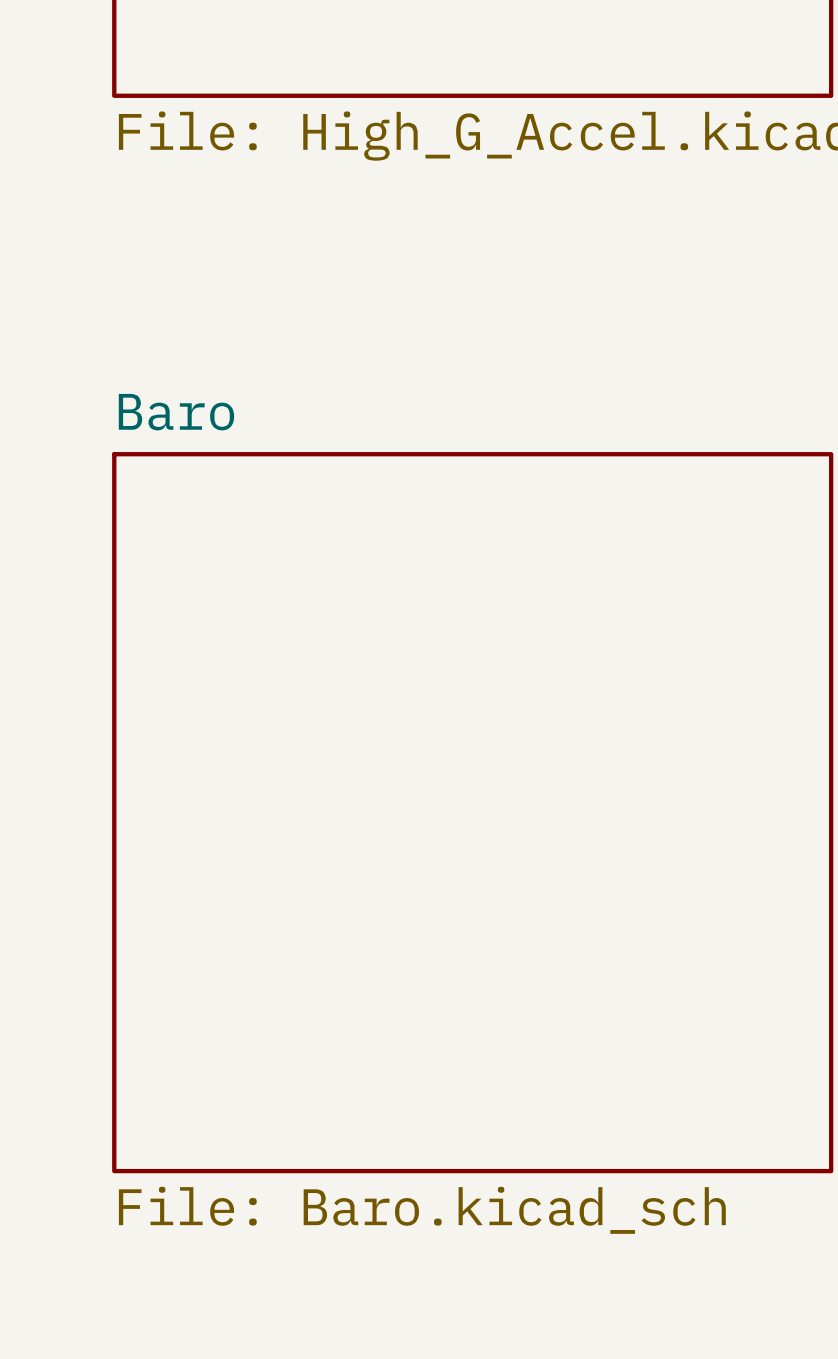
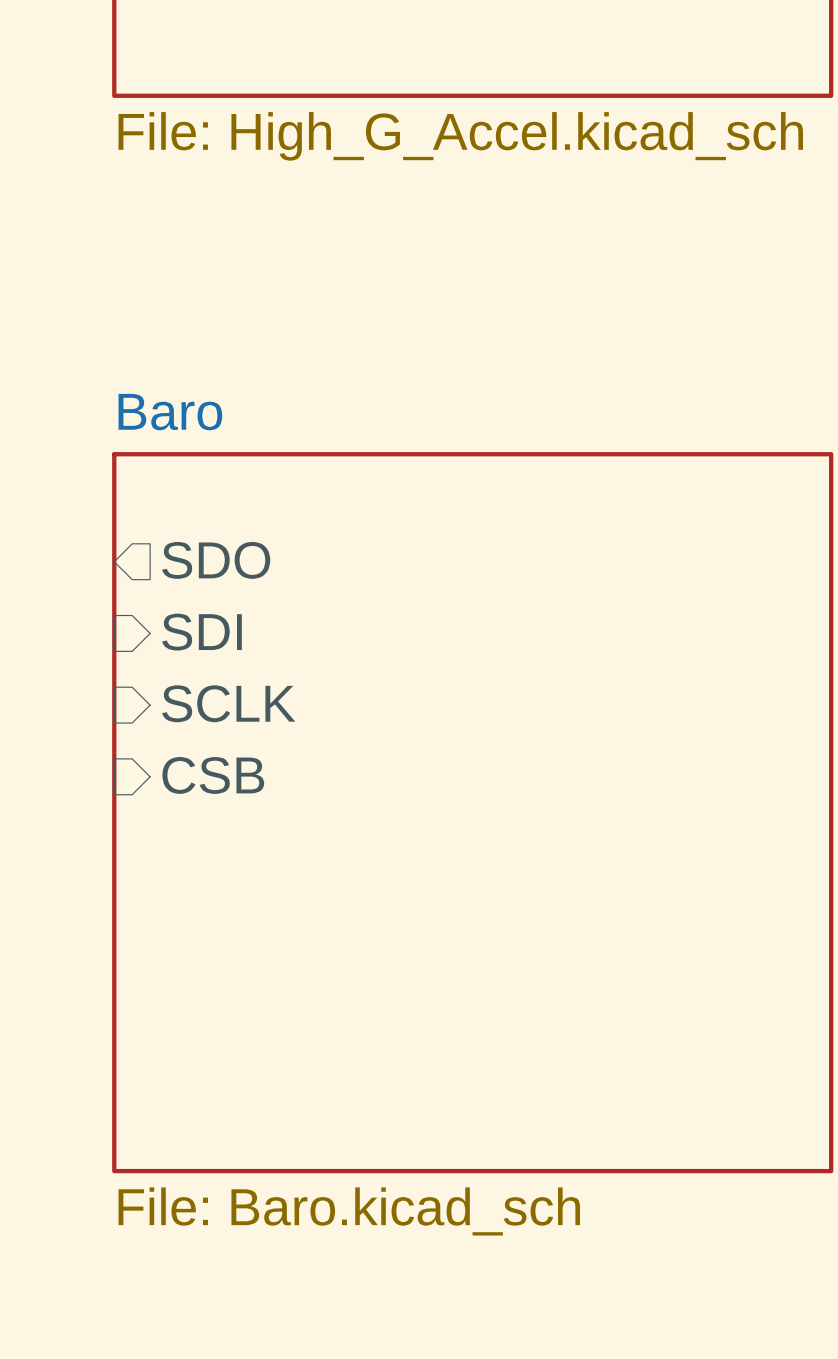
sheet pin: none -> SDO (216, 560)
sheet pin: none -> SDI (202, 632)
sheet pin: none -> SCLK (228, 703)
sheet pin: none -> CSB (213, 775)

